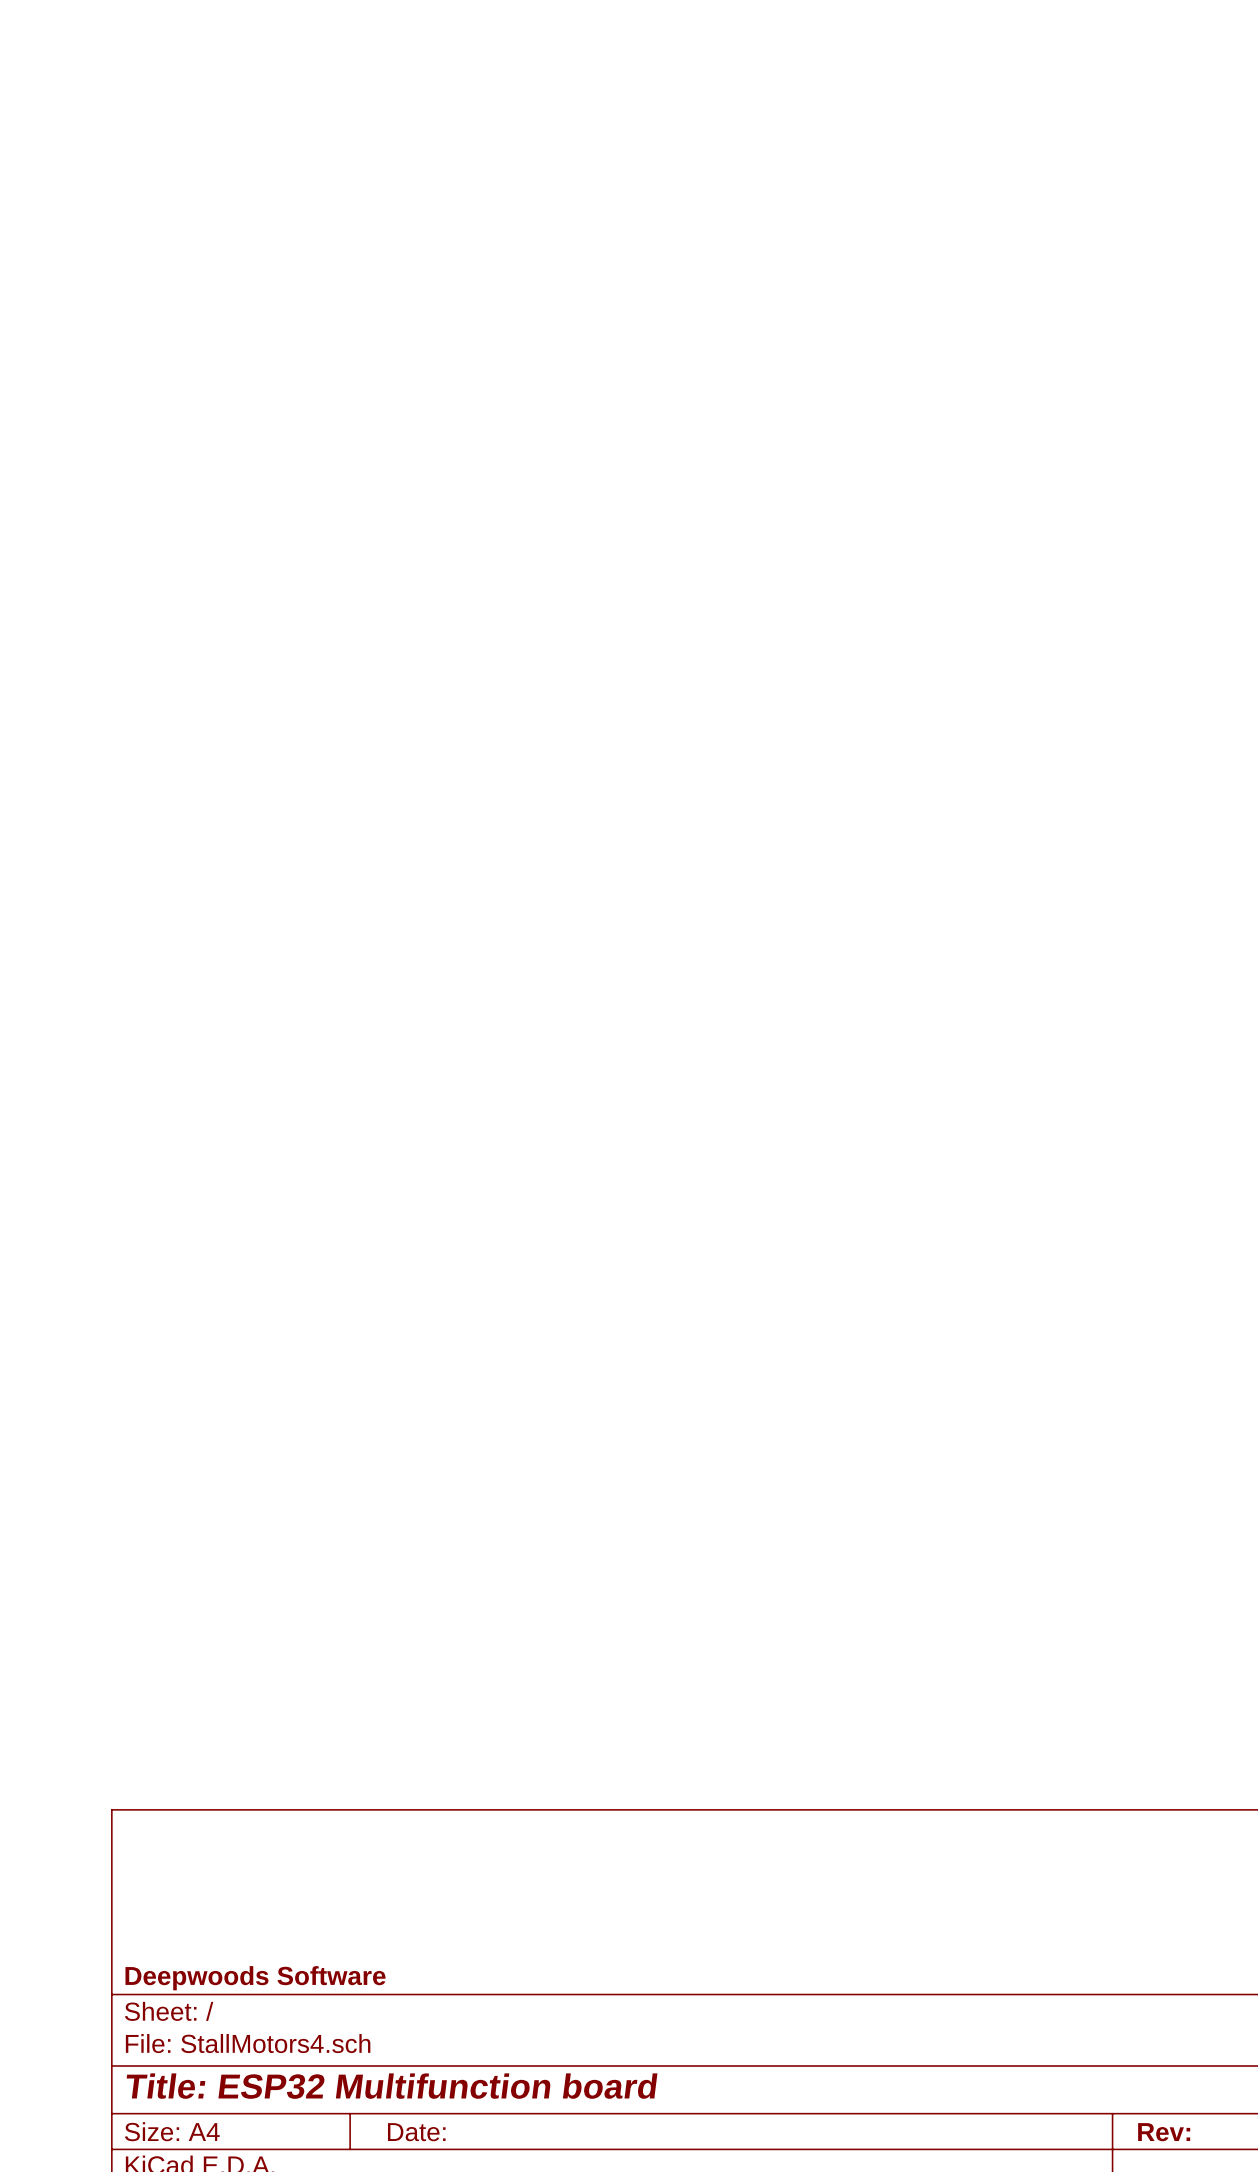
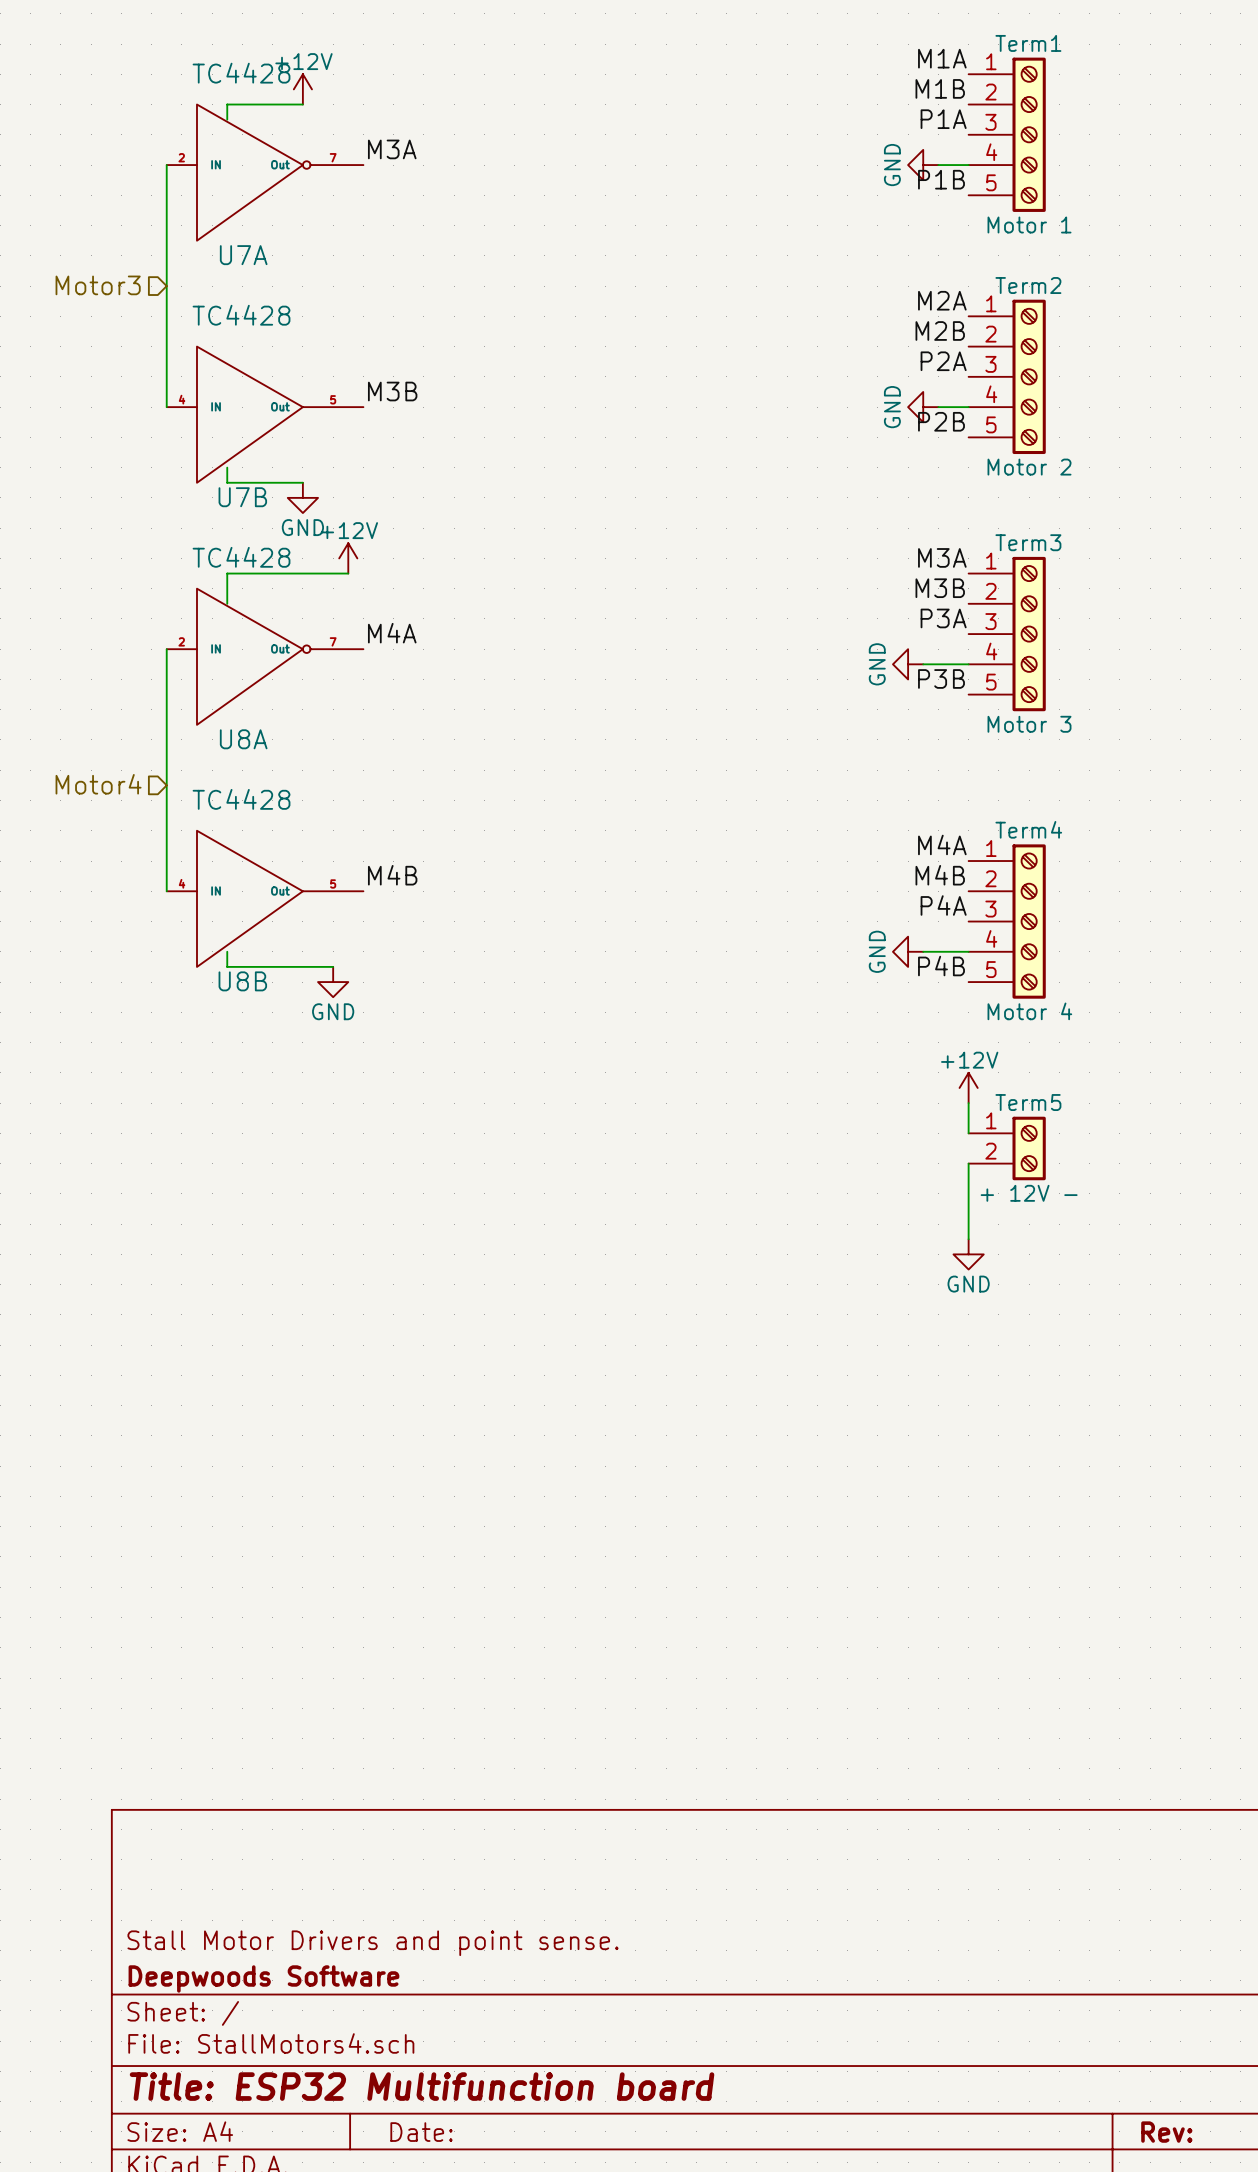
label: none -> M1A (942, 58)
label: none -> M1B (940, 88)
power symbol: none -> +12V (302, 89)
wire: none -> (302, 104) (227, 104) (227, 119)
label: none -> P1A (943, 119)
Term1: none -> Motor 1 (1007, 134)
label: none -> M3A (392, 149)
wire: none -> (166, 165) (166, 407)
power symbol: none -> GND (923, 165)
wire: none -> (938, 165) (968, 165)
U7A: none -> TC4428 (265, 172)
label: none -> P1B (941, 179)
hierarchical label: none -> Motor3 (98, 285)
label: none -> M2A (942, 300)
label: none -> M2B (940, 330)
label: none -> P2A (943, 361)
Term2: none -> Motor 2 (1007, 376)
label: none -> M3B (392, 391)
power symbol: none -> GND (923, 407)
wire: none -> (938, 407) (968, 407)
U7B: none -> TC4428 (265, 414)
label: none -> P2B (941, 421)
wire: none -> (227, 467) (227, 482) (302, 482)
power symbol: none -> GND (302, 497)
label: none -> M3A (942, 557)
power symbol: none -> +12V (348, 558)
wire: none -> (348, 573) (227, 573) (227, 603)
label: none -> M3B (940, 588)
label: none -> P3A (943, 618)
label: none -> M4A (392, 633)
Term3: none -> Motor 3 (1007, 634)
wire: none -> (166, 649) (166, 891)
U8A: none -> TC4428 (265, 656)
power symbol: none -> GND (908, 664)
wire: none -> (923, 664) (968, 664)
label: none -> P3B (941, 678)
hierarchical label: none -> Motor4 (98, 784)
label: none -> M4A (942, 844)
label: none -> M4B (392, 875)
label: none -> M4B (940, 875)
U8B: none -> TC4428 (265, 898)
label: none -> P4A (943, 905)
Term4: none -> Motor 4 (1007, 921)
wire: none -> (227, 951) (227, 966) (333, 966)
power symbol: none -> GND (908, 951)
wire: none -> (923, 951) (968, 951)
label: none -> P4B (941, 966)
power symbol: none -> GND (333, 982)
power symbol: none -> +12V (968, 1087)
wire: none -> (968, 1103) (968, 1133)
Term5: none -> + 12V - (1007, 1148)
wire: none -> (968, 1163) (968, 1239)
power symbol: none -> GND (968, 1254)
title block: none -> Stall Motor Drivers and point sense. (373, 1943)

